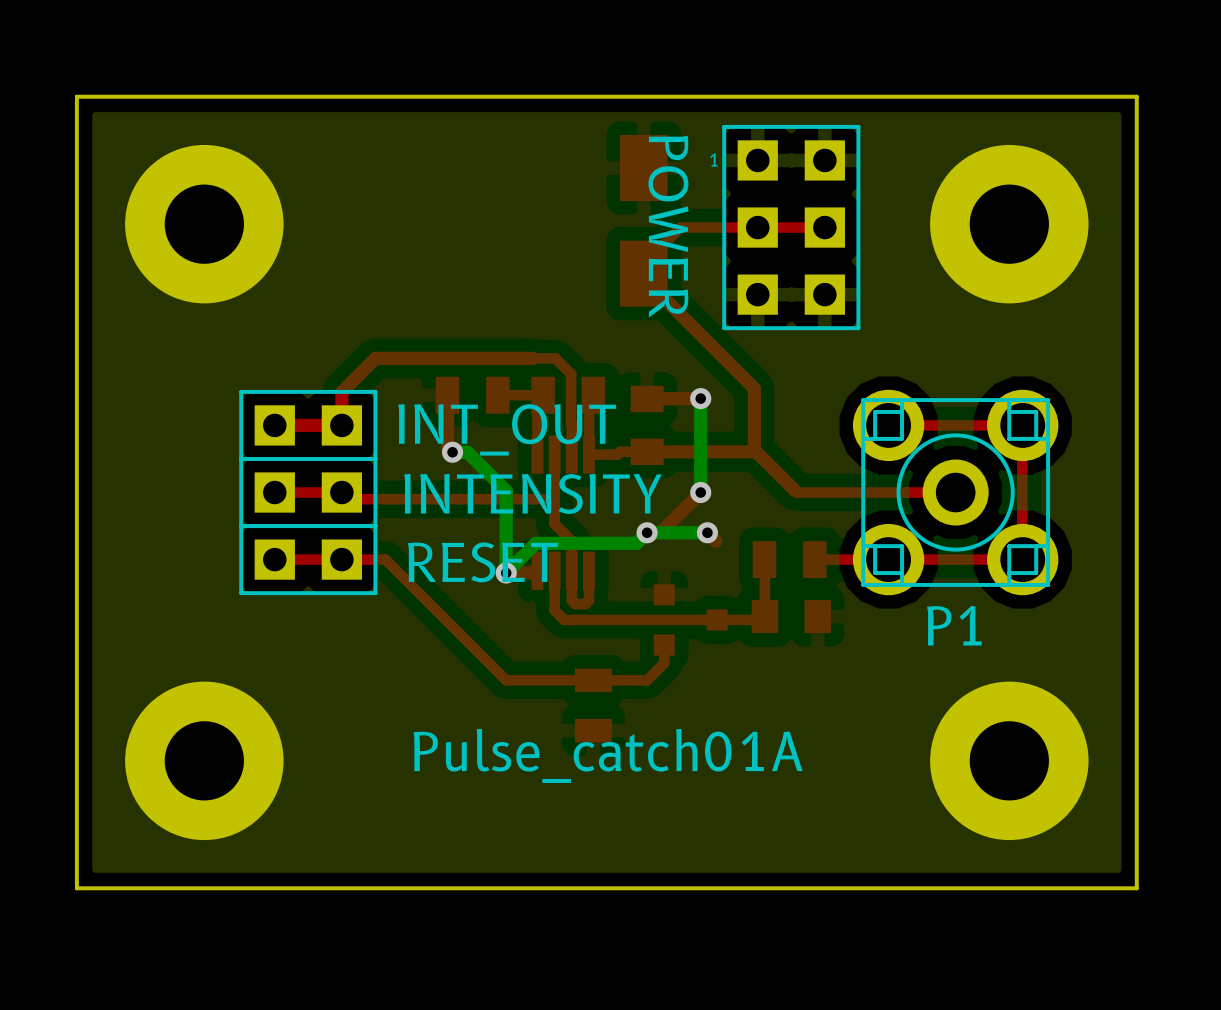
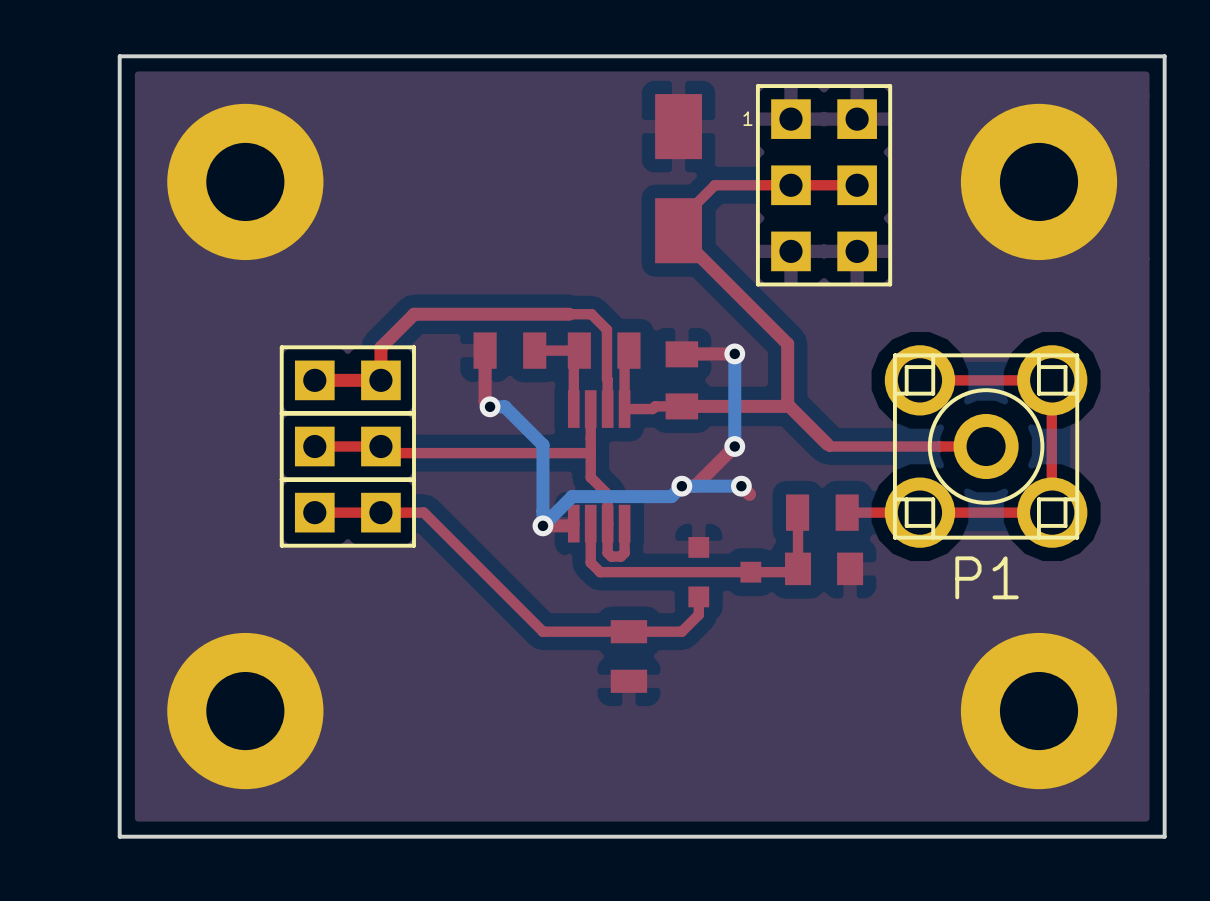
text: POWER (668, 226) -> none
text: INT_OUT (507, 429) -> none
text: INTENSITY (533, 493) -> none
text: RESET (482, 562) -> none
text: Pulse_catch01A (608, 755) -> none

